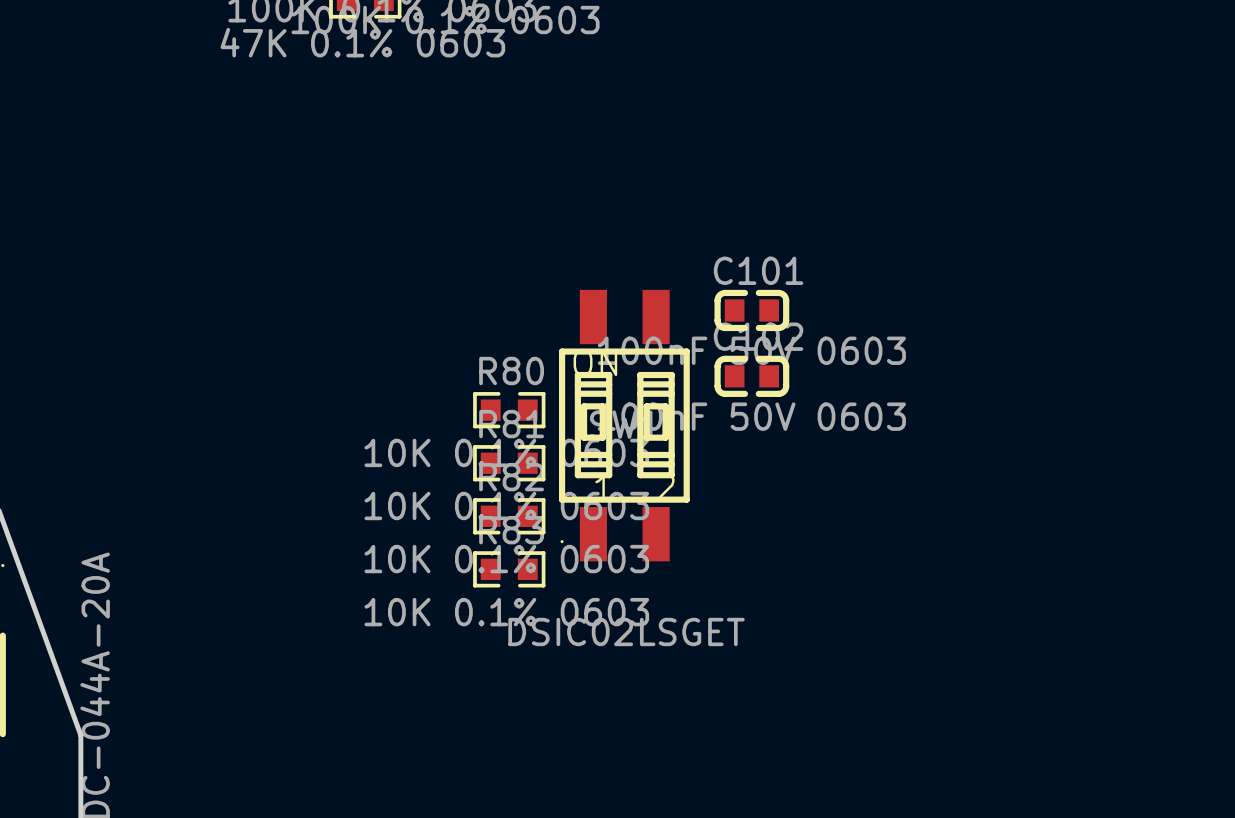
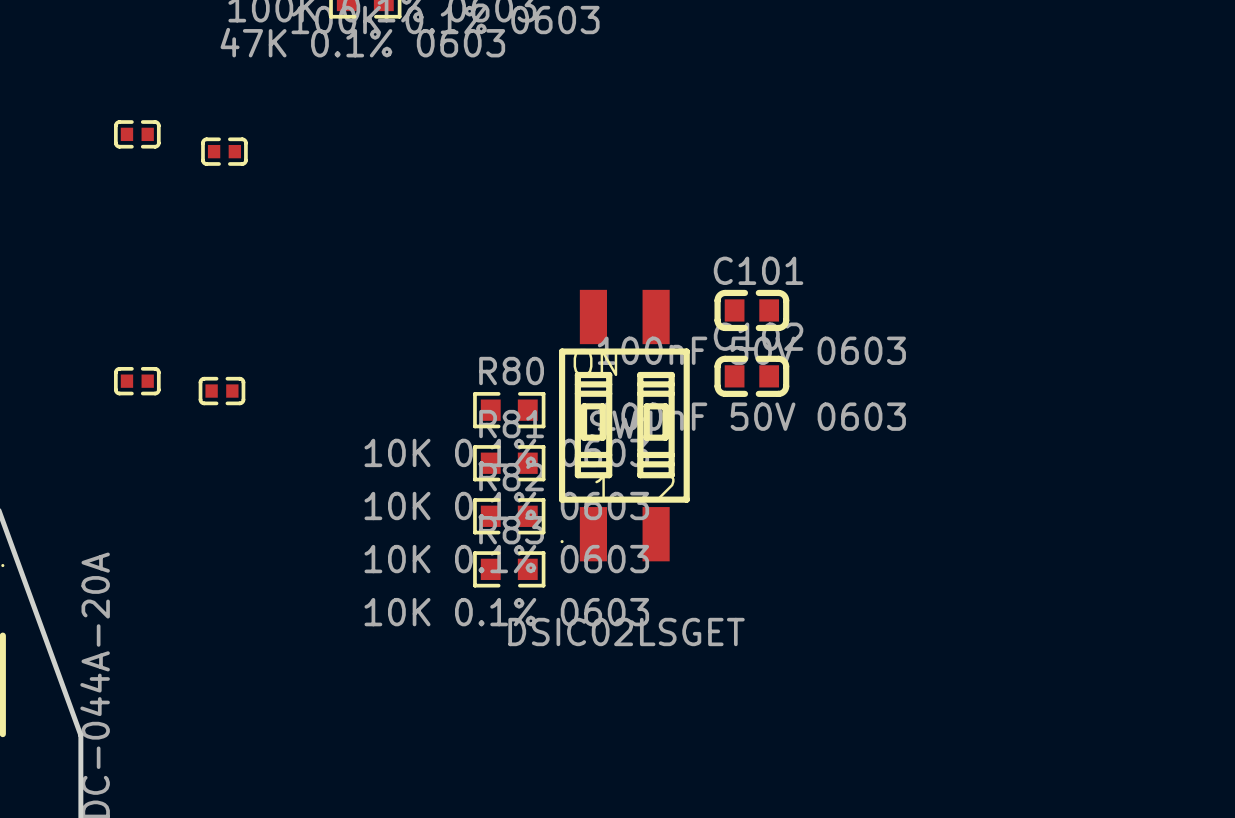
part: none -> (137, 134)
part: none -> (224, 151)
part: none -> (137, 381)
part: none -> (221, 391)

